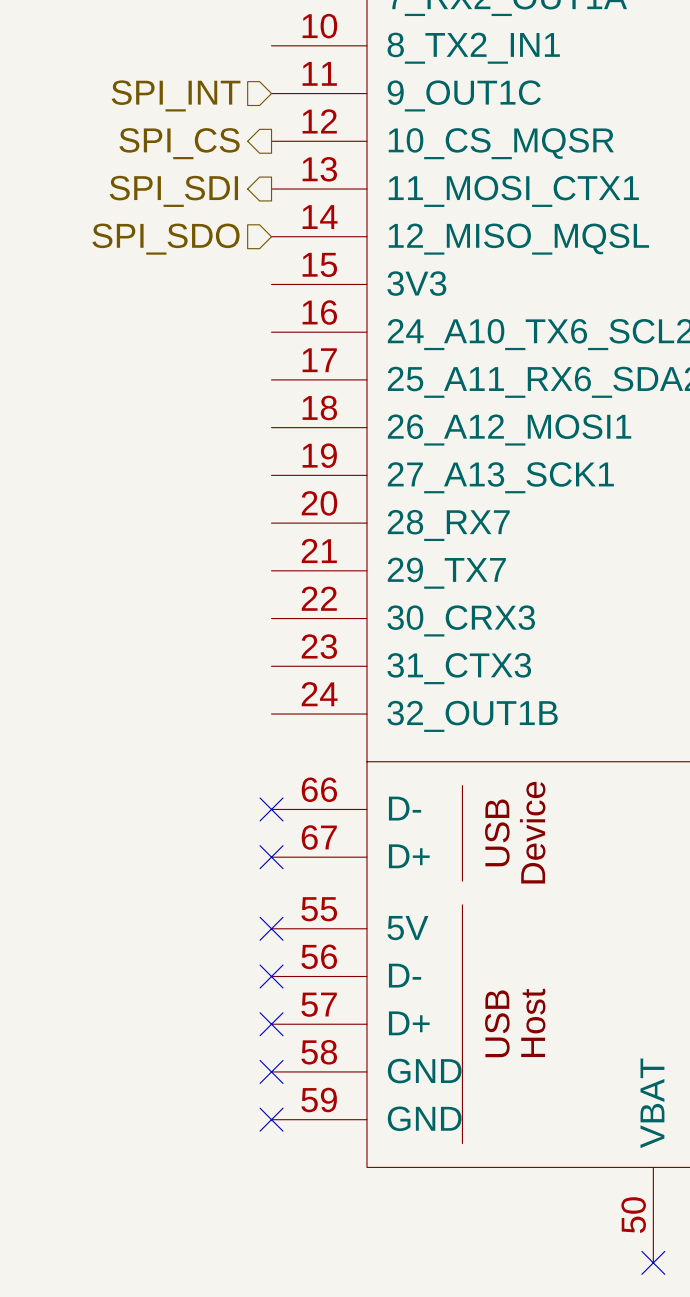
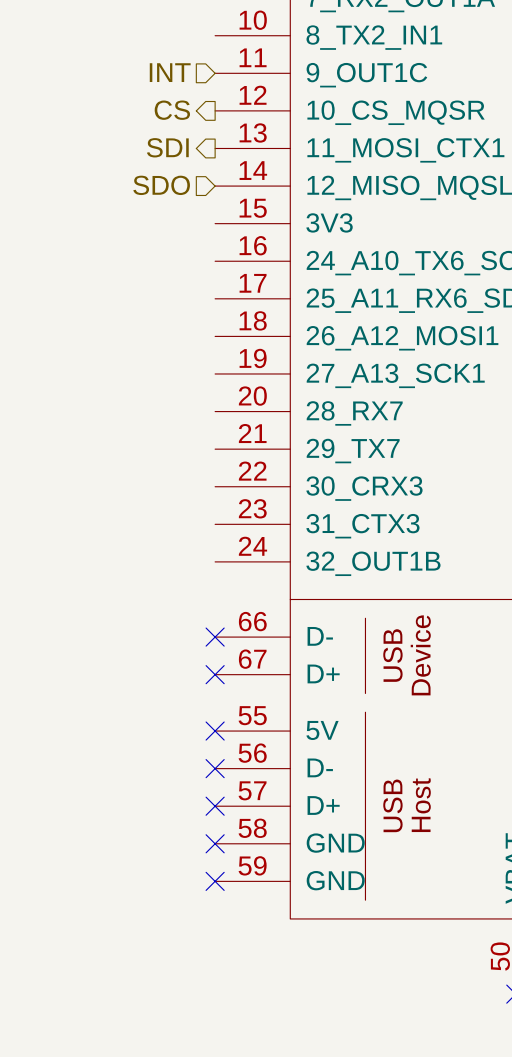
hierarchical label: SPI_INT (176, 95) -> INT (170, 72)
hierarchical label: SPI_CS (179, 143) -> CS (172, 110)
hierarchical label: SPI_SDI (173, 191) -> SDI (167, 147)
hierarchical label: SPI_SDO (166, 239) -> SDO (161, 185)

